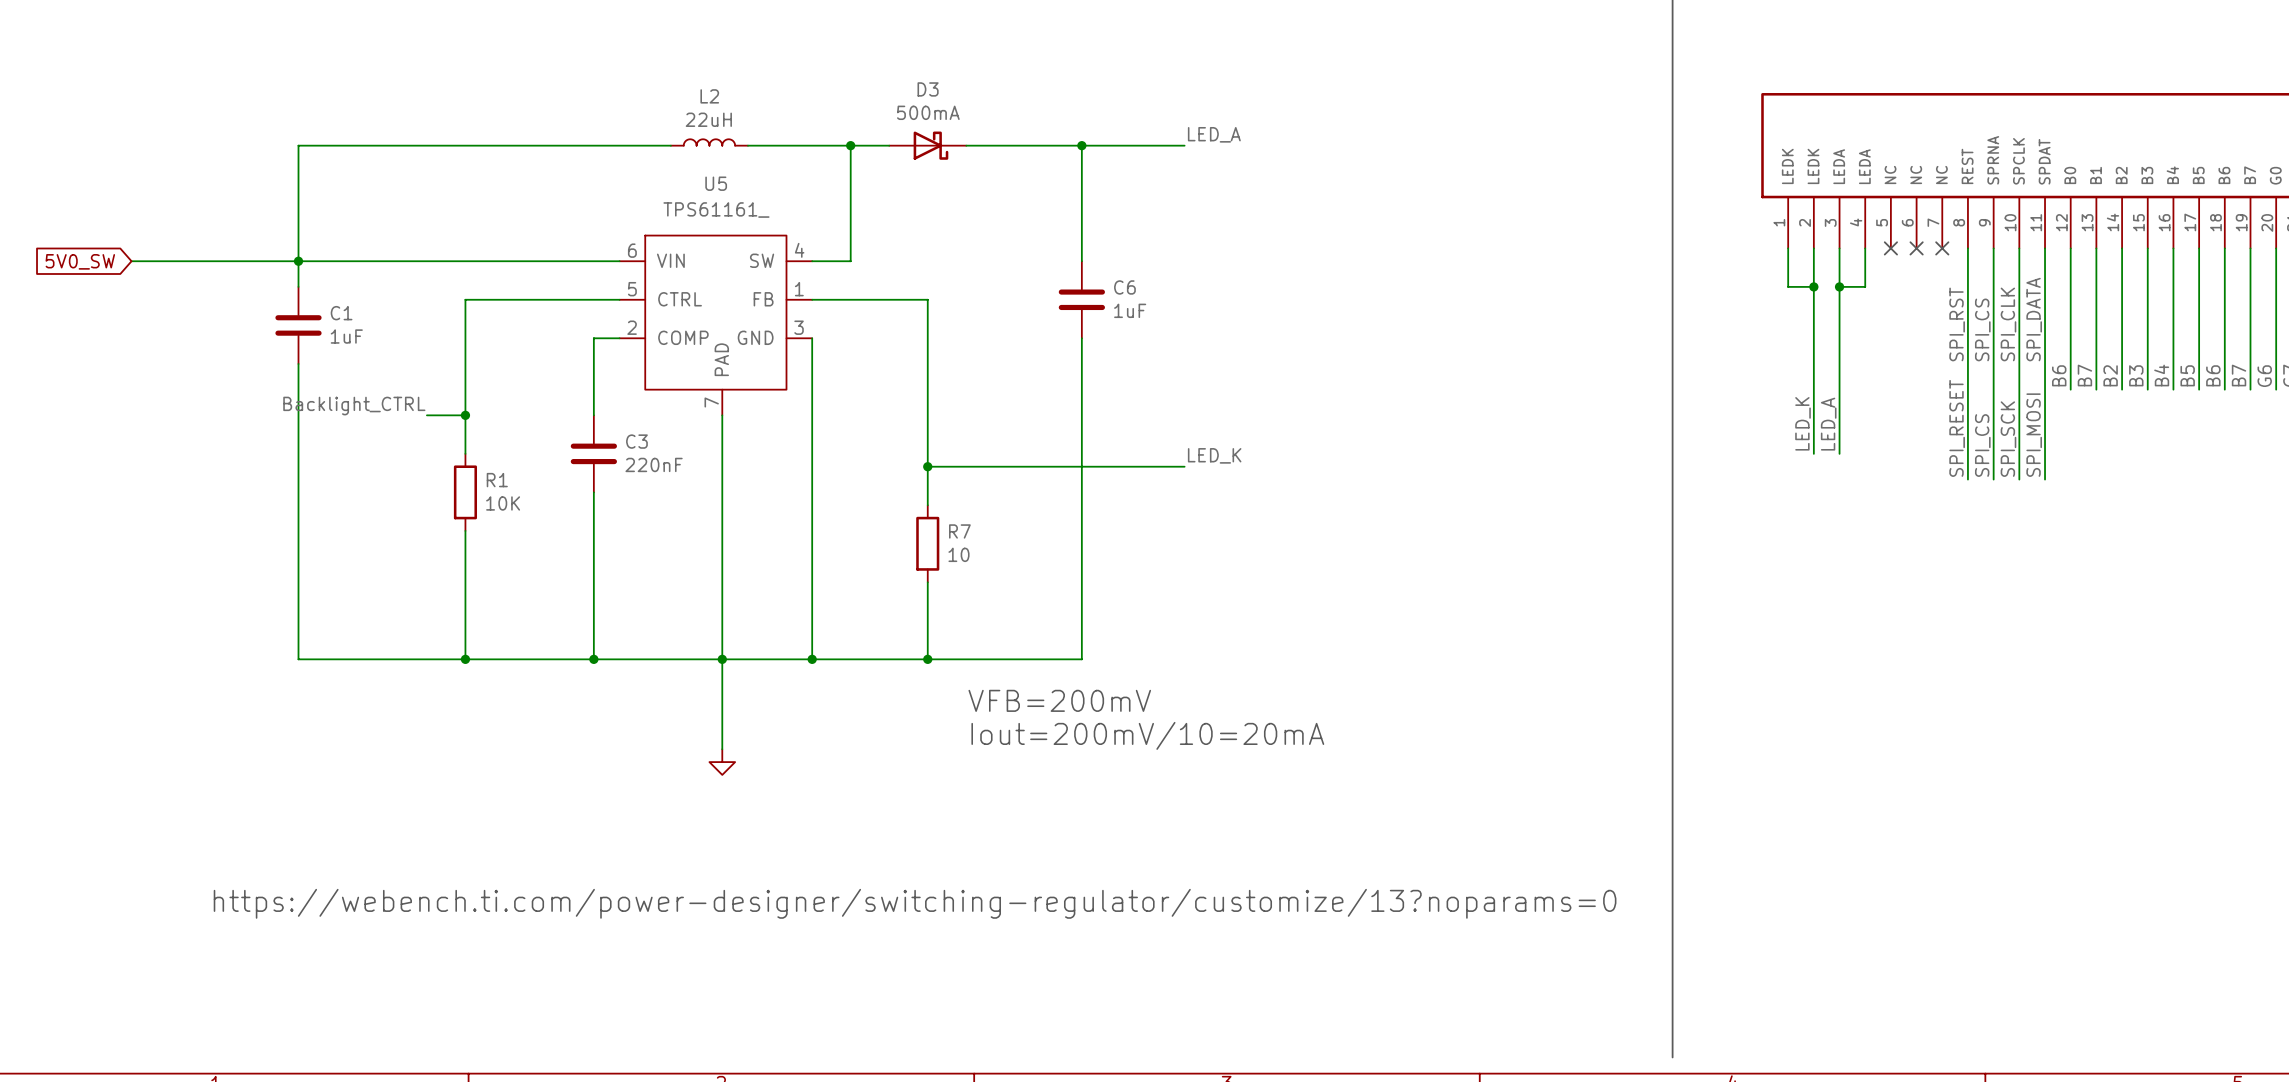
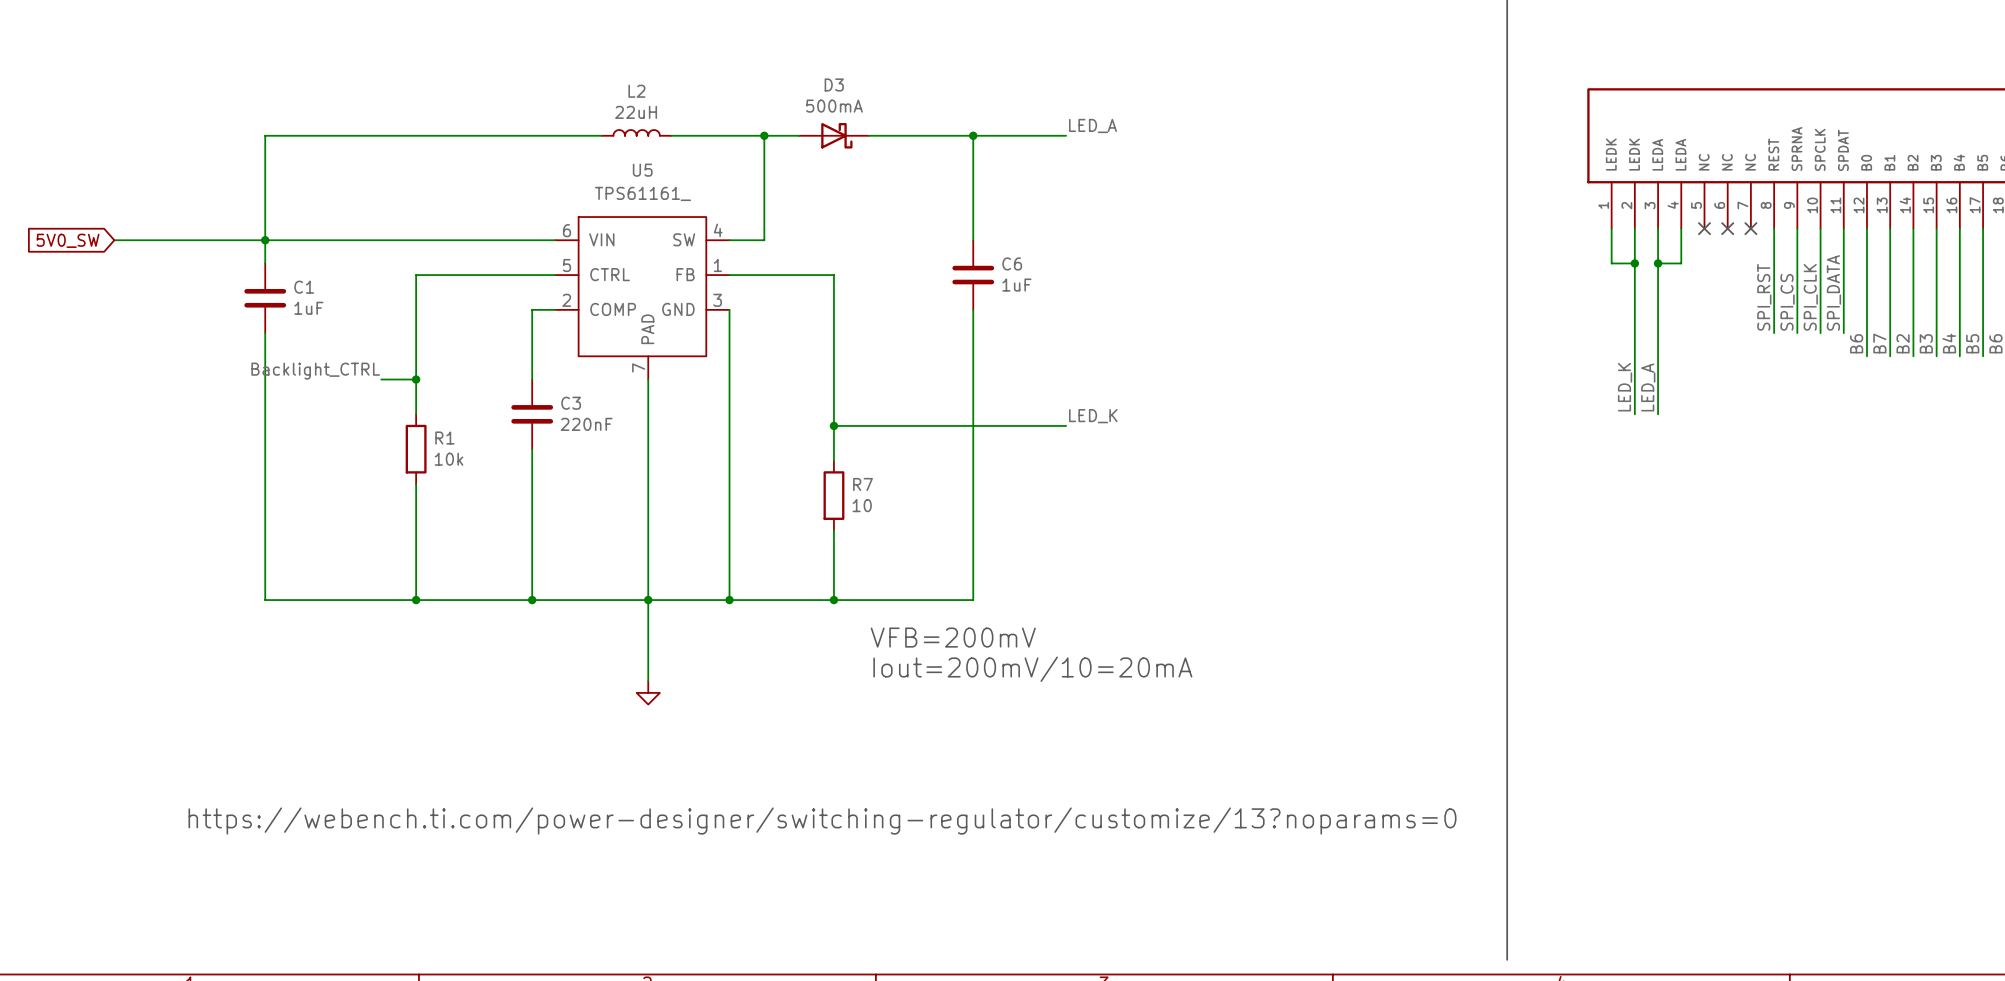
wire: (1967, 363) (1967, 479) -> none
wire: (1993, 363) (1993, 479) -> none
wire: (2019, 363) (2019, 479) -> none
wire: (2045, 363) (2045, 479) -> none
label: SPI_RESET (1957, 428) -> none
label: SPI_MOSI (2034, 435) -> none
label: SPI_SCK (2008, 439) -> none
label: SPI_CS (1982, 445) -> none
R1 value: 10K (503, 503) -> 10k (449, 459)

